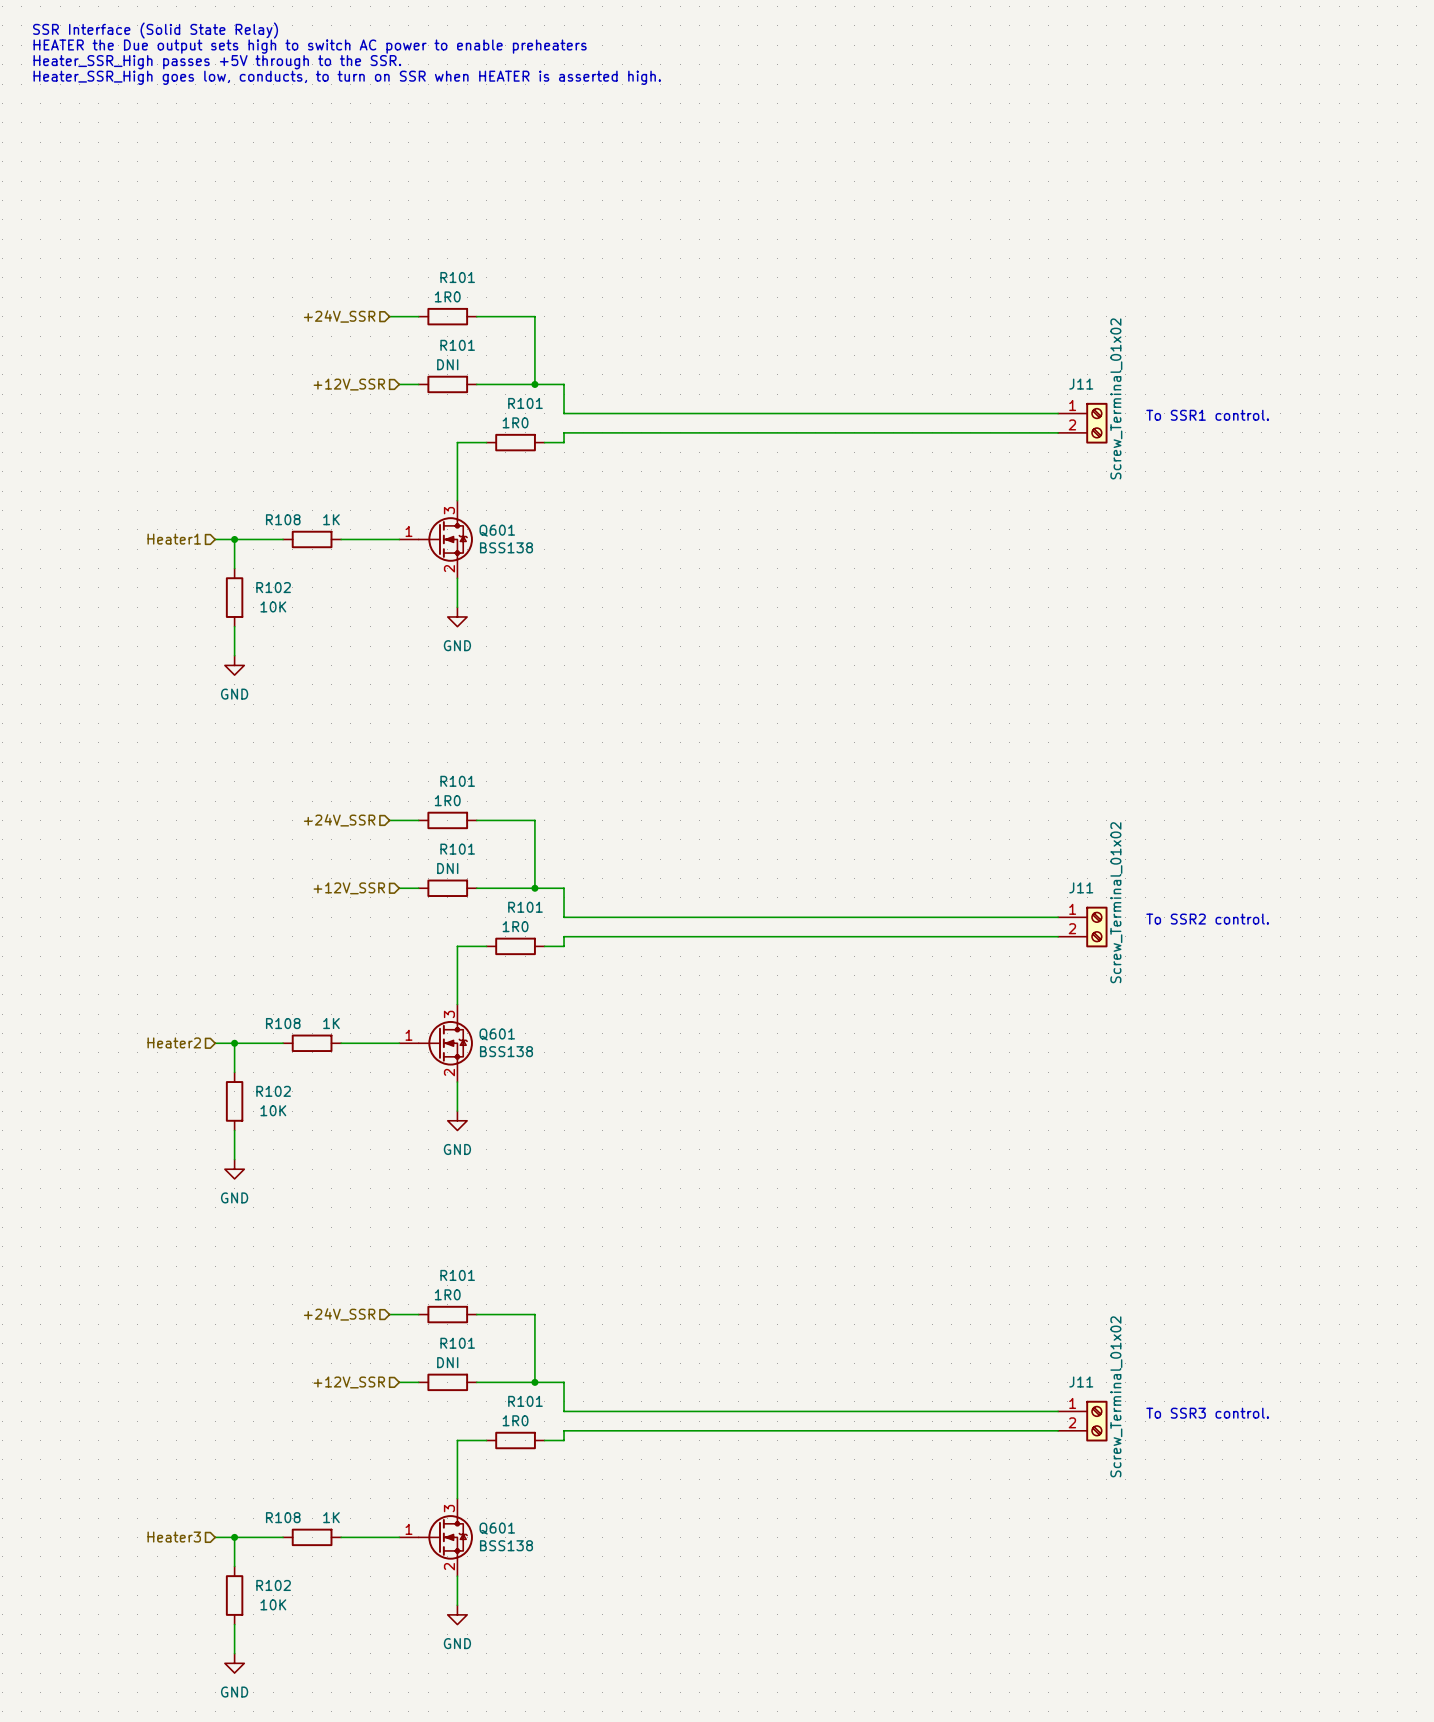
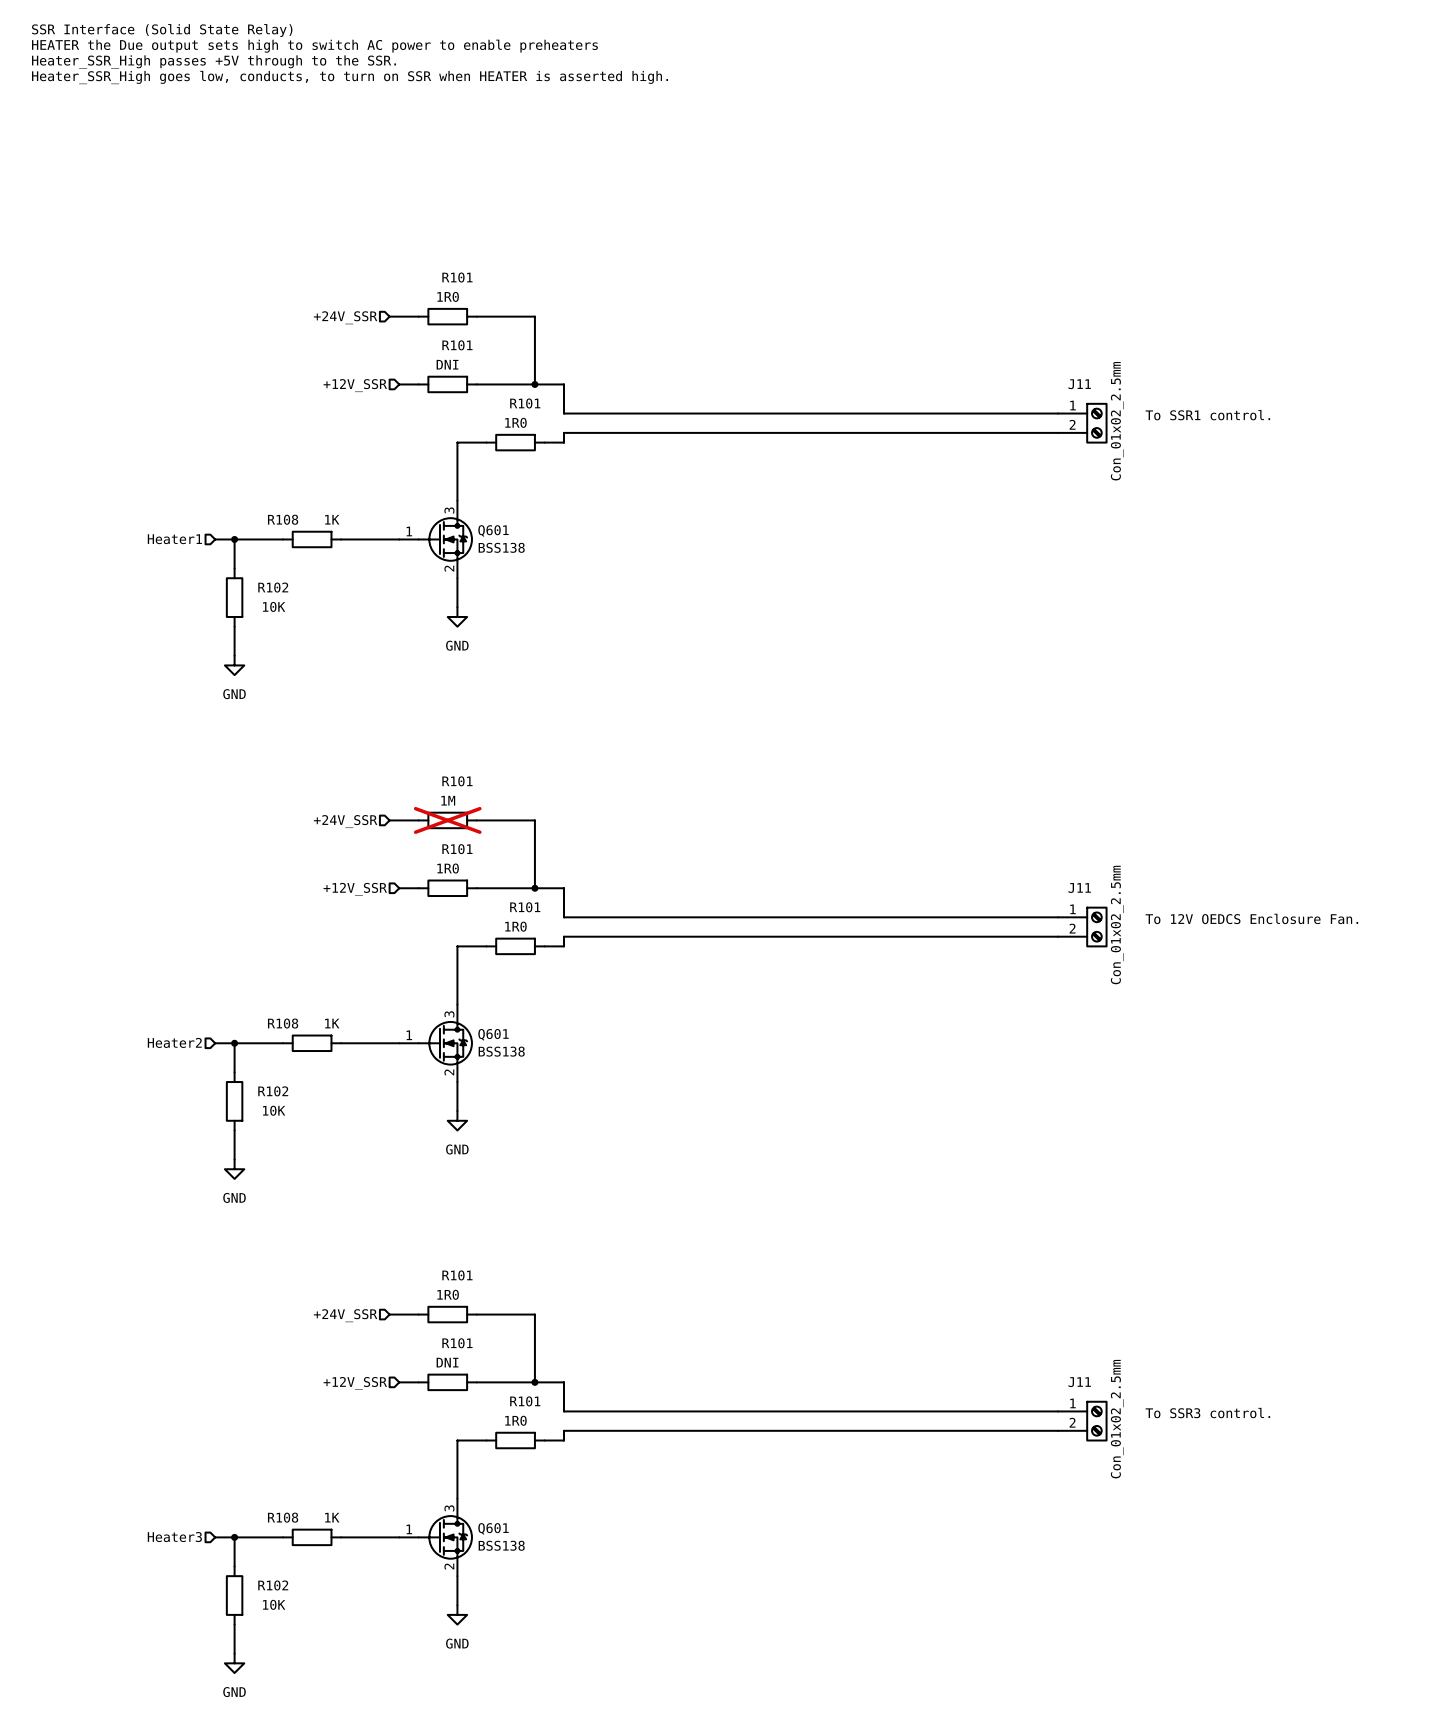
J11 value: Screw_Terminal_01x02 (1116, 398) -> Con_01x02_2.5mm (1117, 421)
R101 value: 1R0 (447, 800) -> 1M (448, 800)
R101 do-not-place cross: none -> (447, 820)
R101 value: DNI (447, 868) -> 1R0 (448, 868)
J11 value: Screw_Terminal_01x02 (1116, 902) -> Con_01x02_2.5mm (1117, 925)
text: To SSR2 control. (1207, 919) -> To 12V OEDCS Enclosure Fan. (1251, 918)
J11 value: Screw_Terminal_01x02 (1116, 1396) -> Con_01x02_2.5mm (1117, 1419)

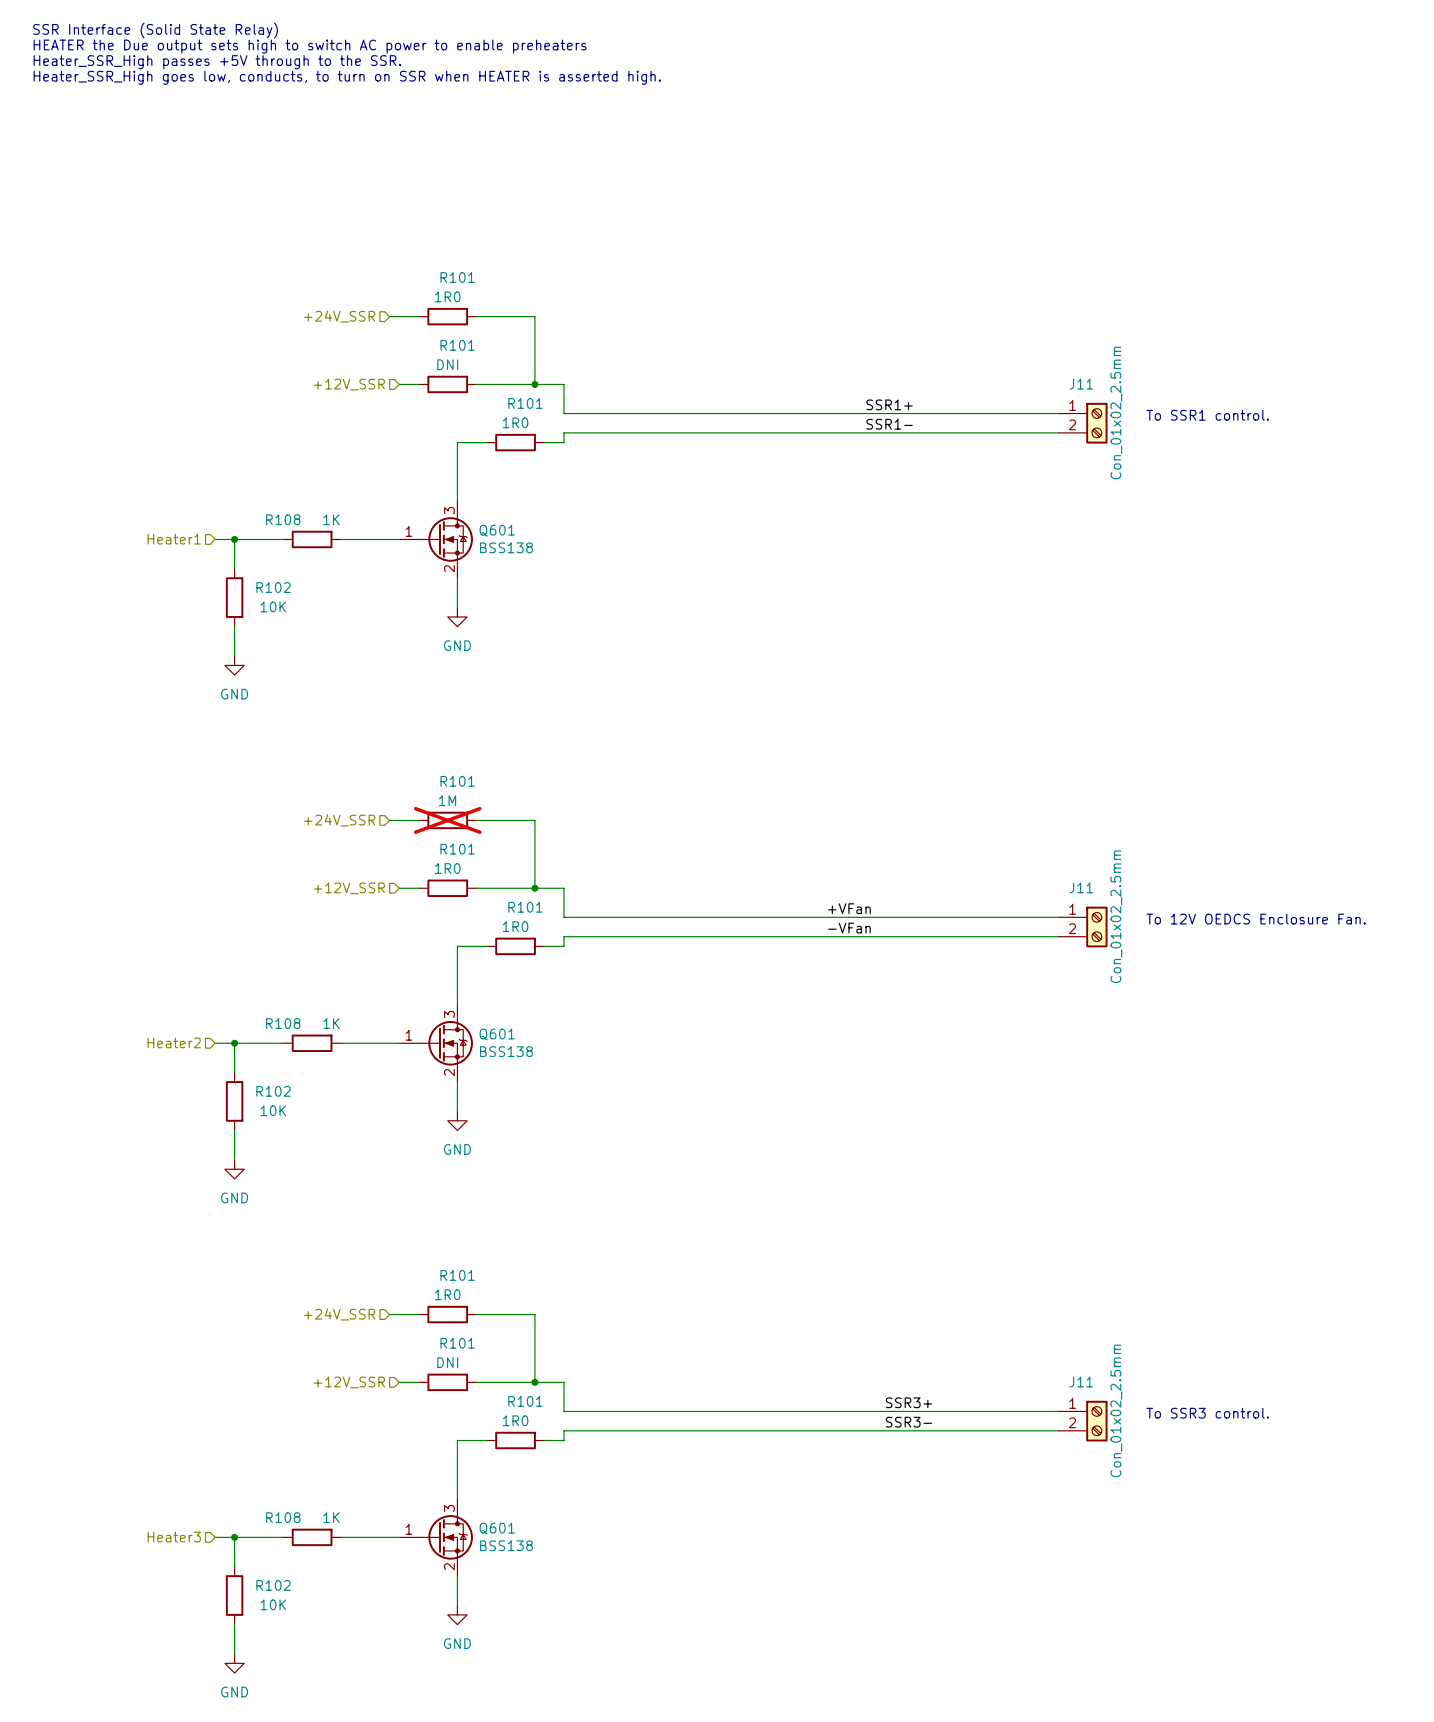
label: none -> SSR1+ (889, 404)
label: none -> SSR1- (889, 424)
label: none -> +VFan (849, 908)
label: none -> -VFan (849, 928)
label: none -> SSR3+ (908, 1402)
label: none -> SSR3- (908, 1422)

